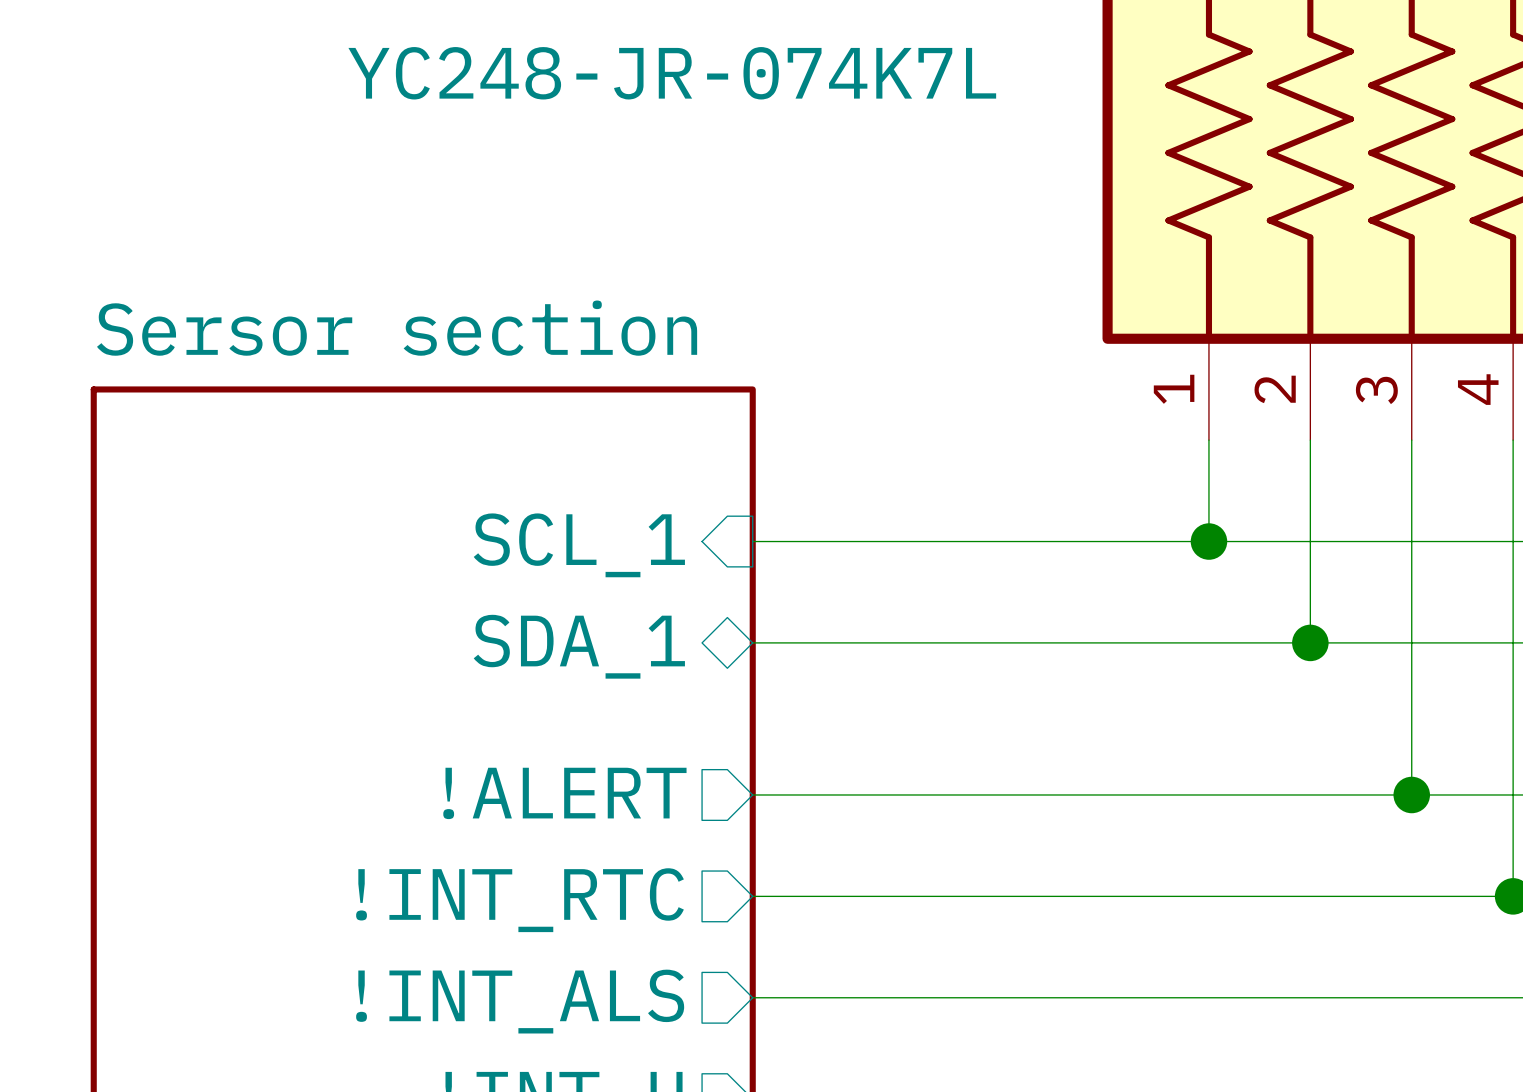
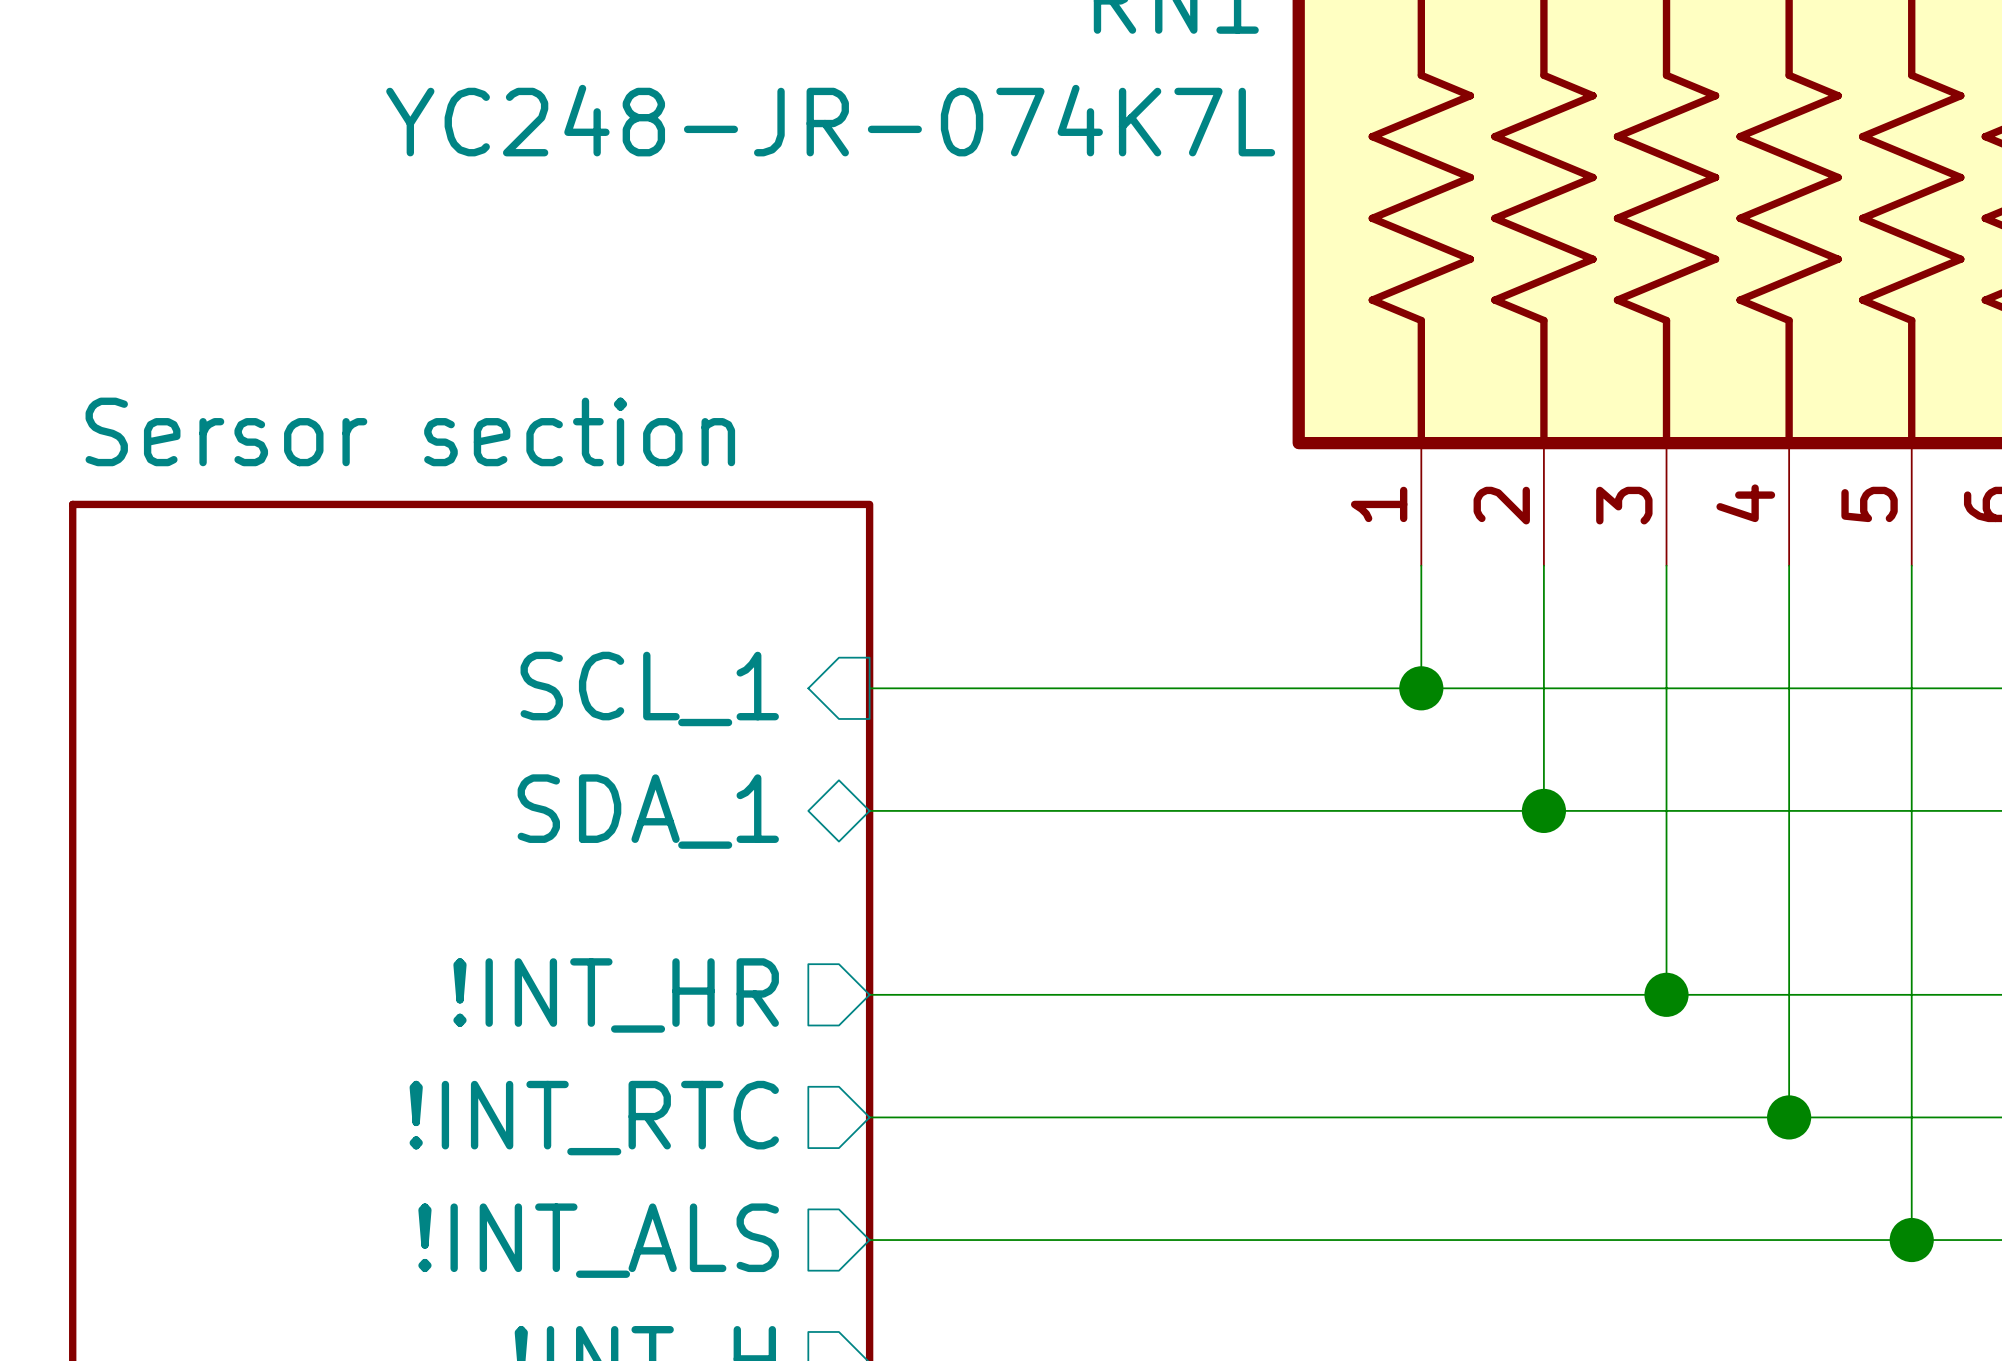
sheet pin: !ALERT (564, 793) -> !INT_HR (616, 995)

